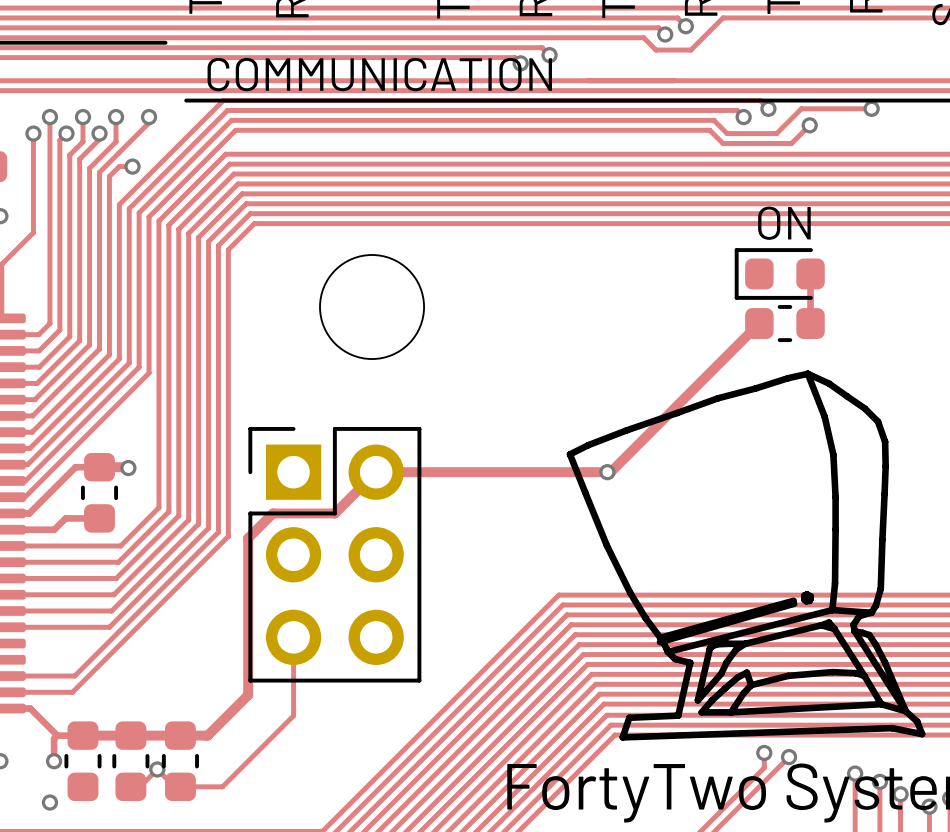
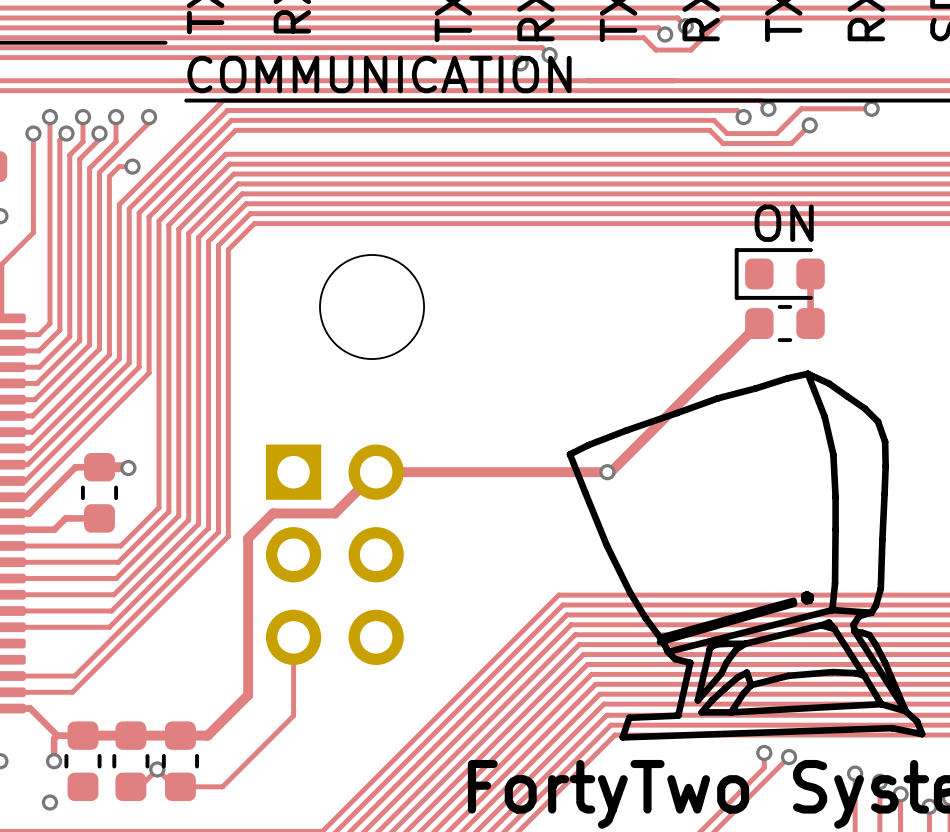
part footprint: [248, 426, 422, 683] -> [265, 444, 404, 665]

